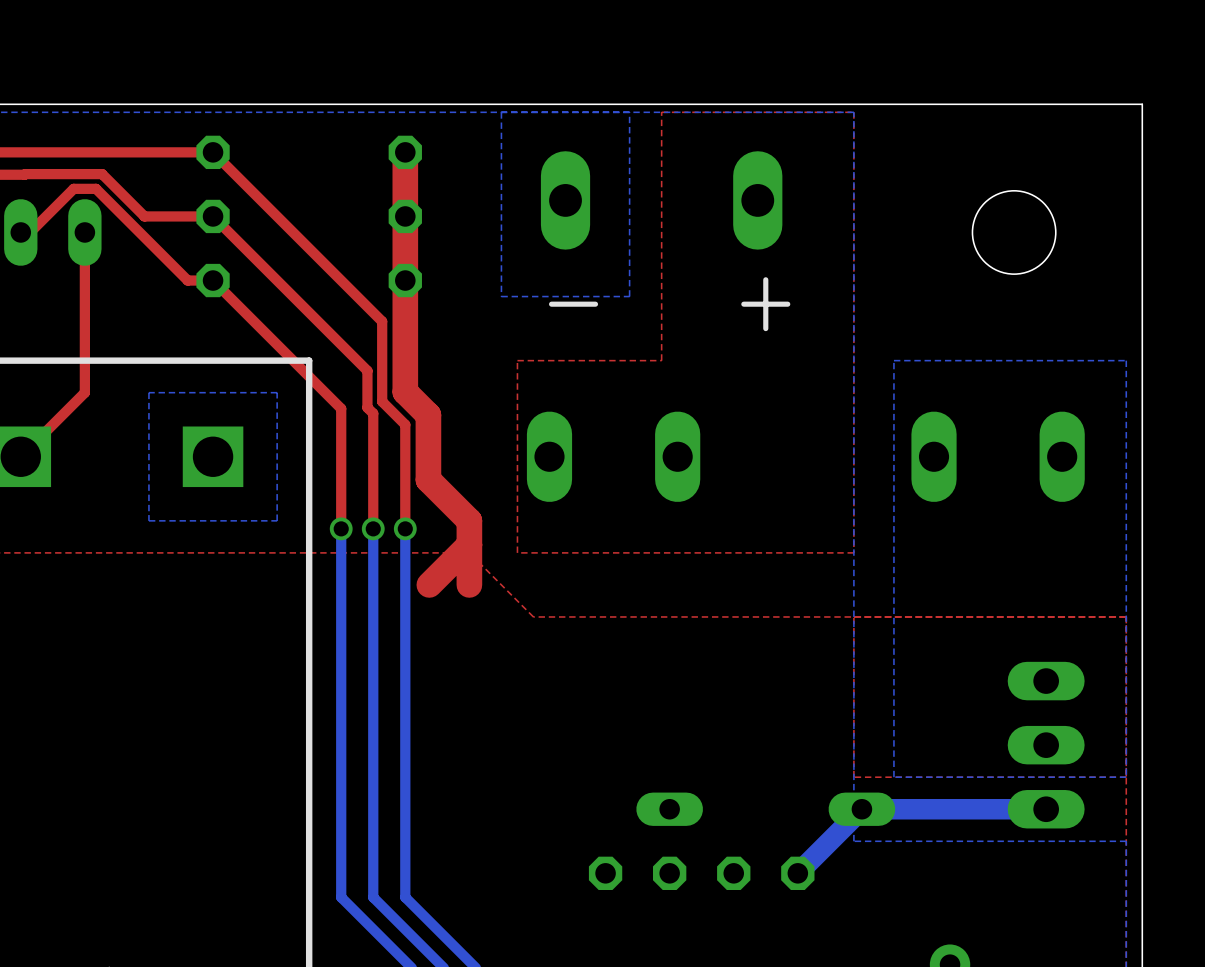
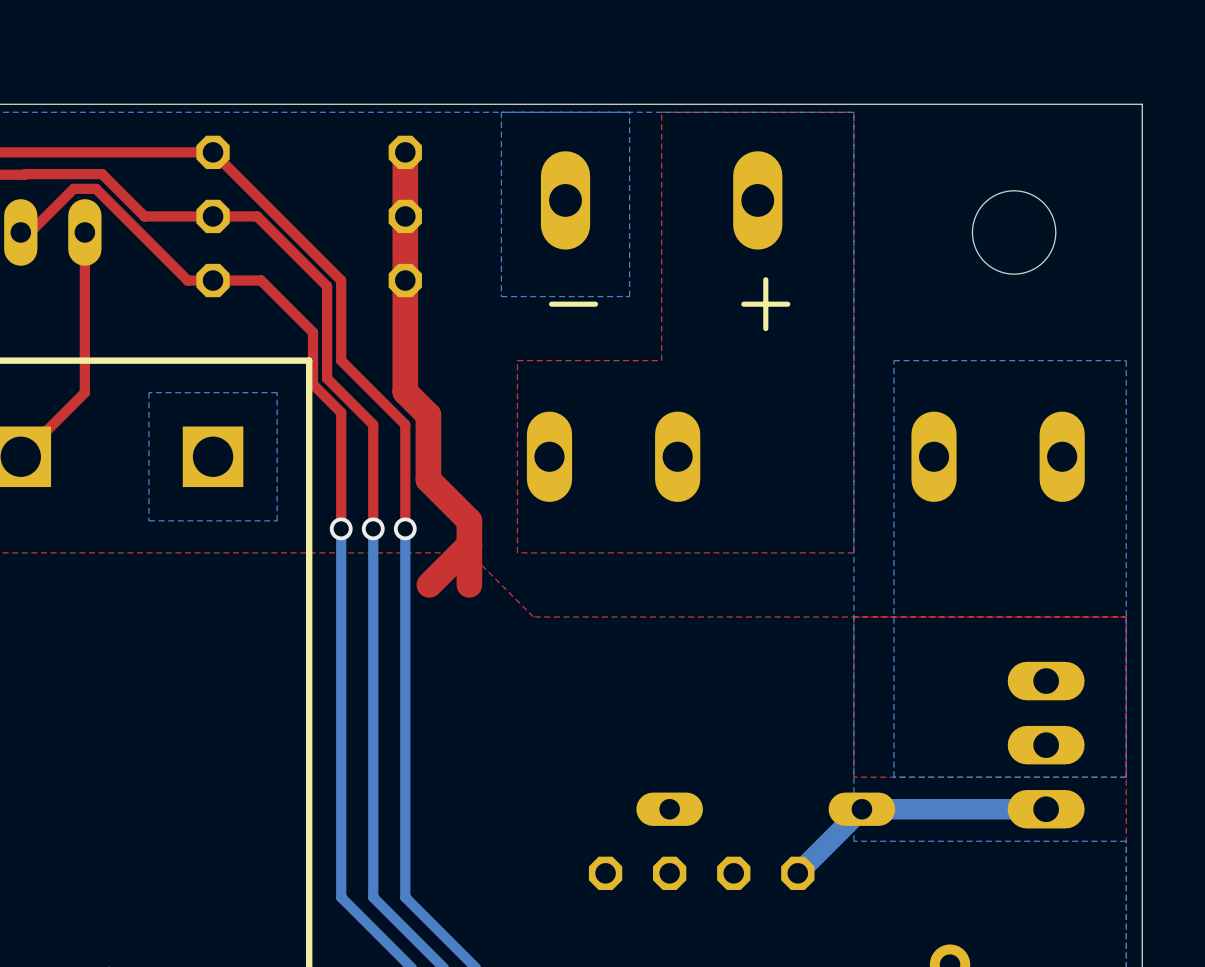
top track: (213, 216) (367, 370) (367, 407) (373, 413) (373, 424) -> (213, 216) (257, 216) (327, 286) (327, 378) (373, 424)
top track: (213, 280) (341, 408) (341, 412) -> (213, 280) (261, 280) (313, 332) (313, 384) (341, 412)
top track: (341, 280) (382, 321) (382, 401) -> (341, 280) (341, 360) (382, 401)

